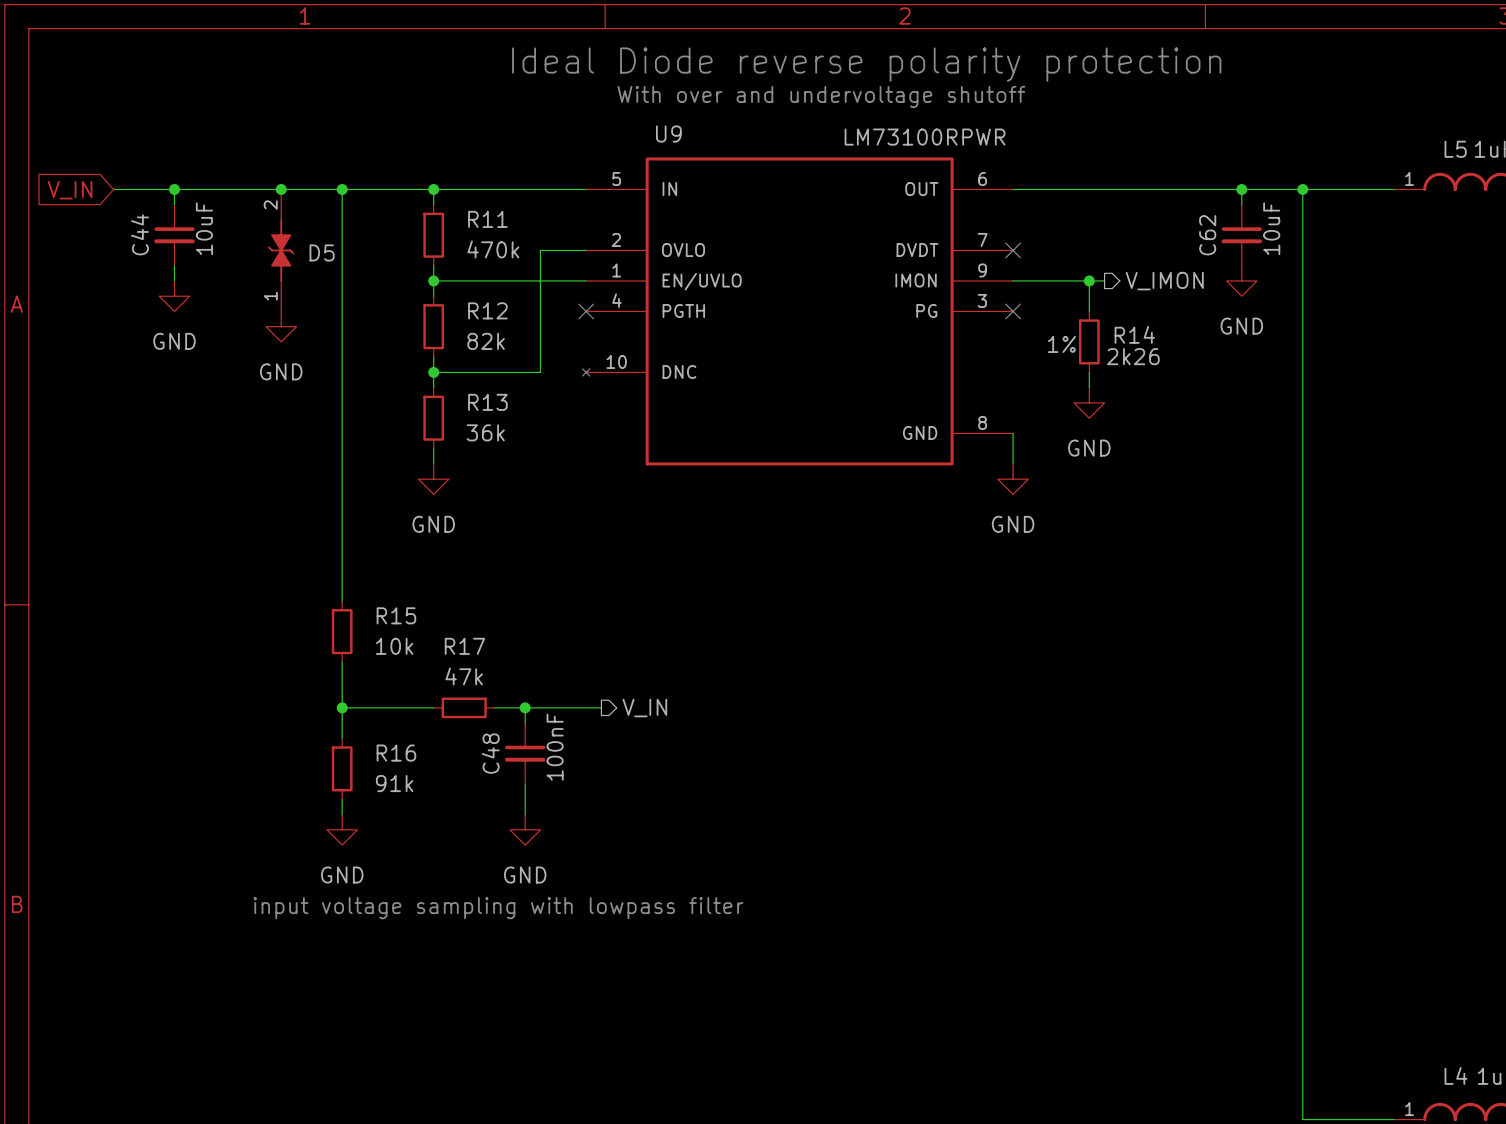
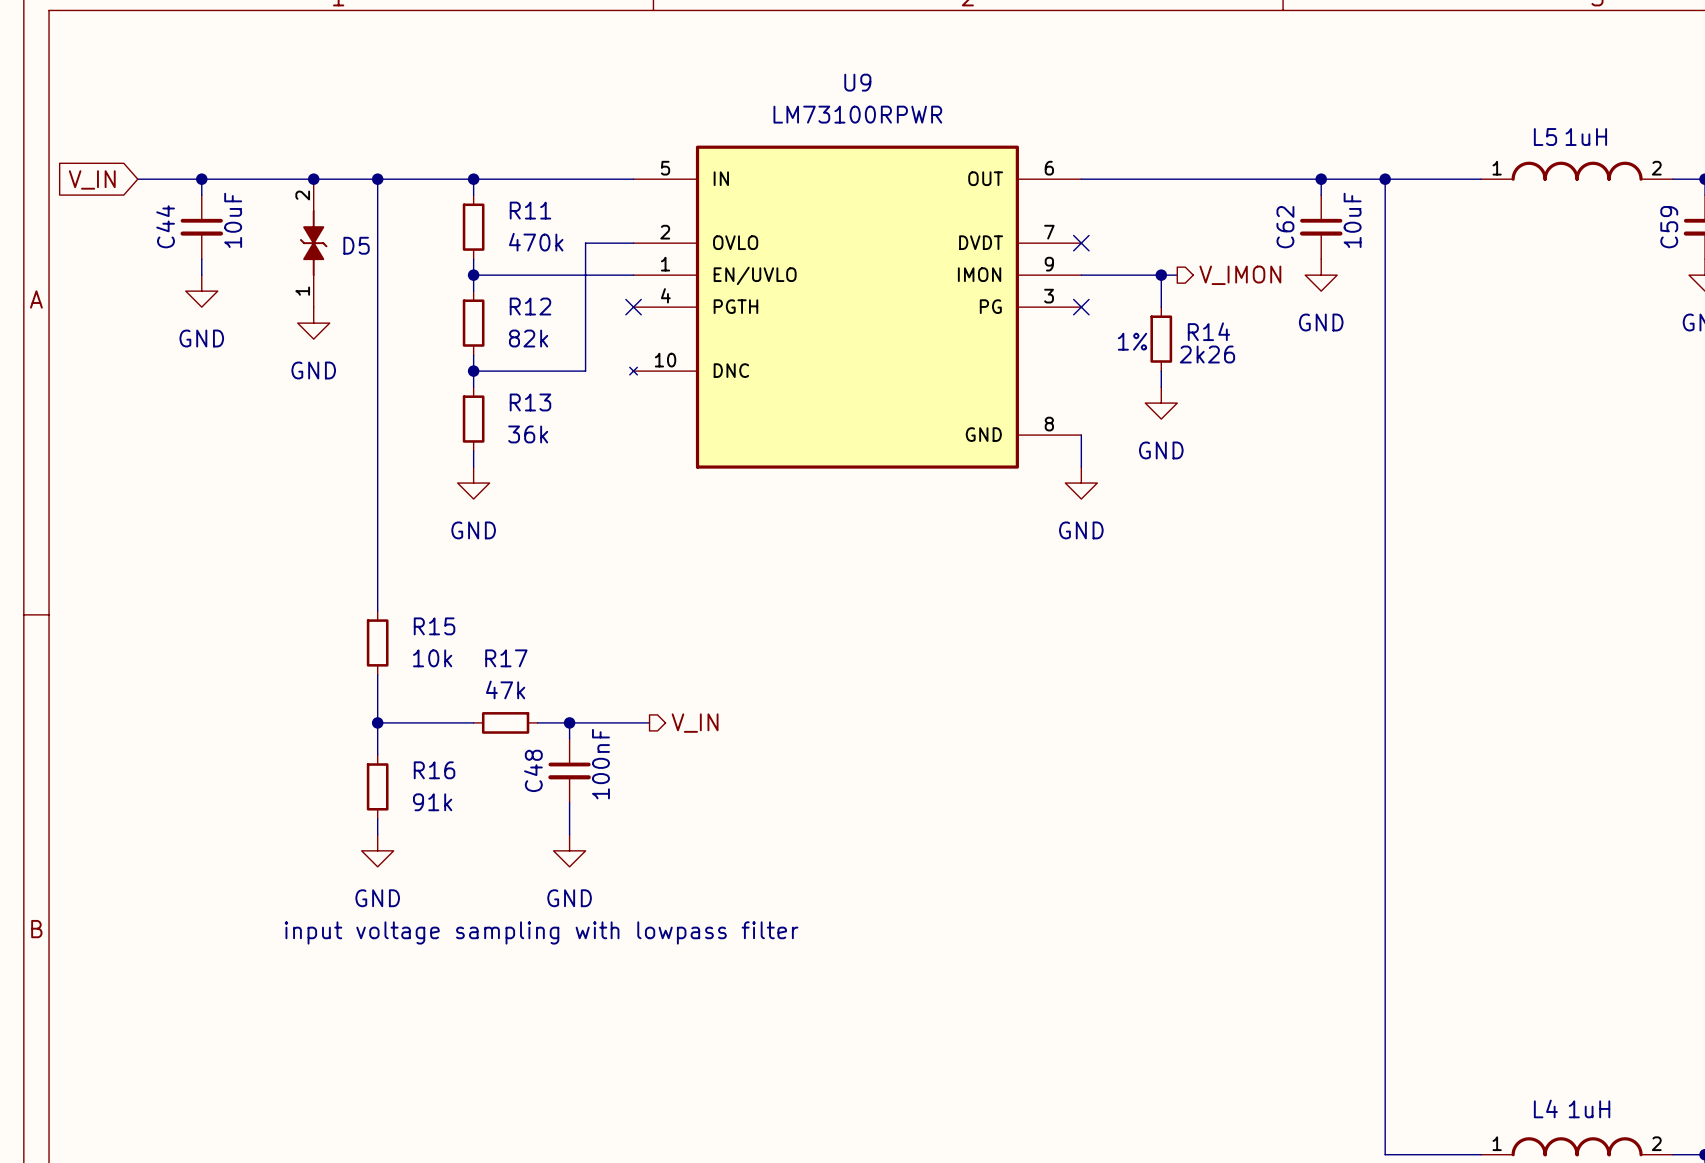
text: Ideal Diode reverse polarity protection (866, 64) -> none
text: With over and undervoltage shutoff (821, 96) -> none
U9 name position: U9 (668, 134) -> U9 (857, 82)
U9 value position: LM73100RPWR (925, 137) -> LM73100RPWR (857, 114)

